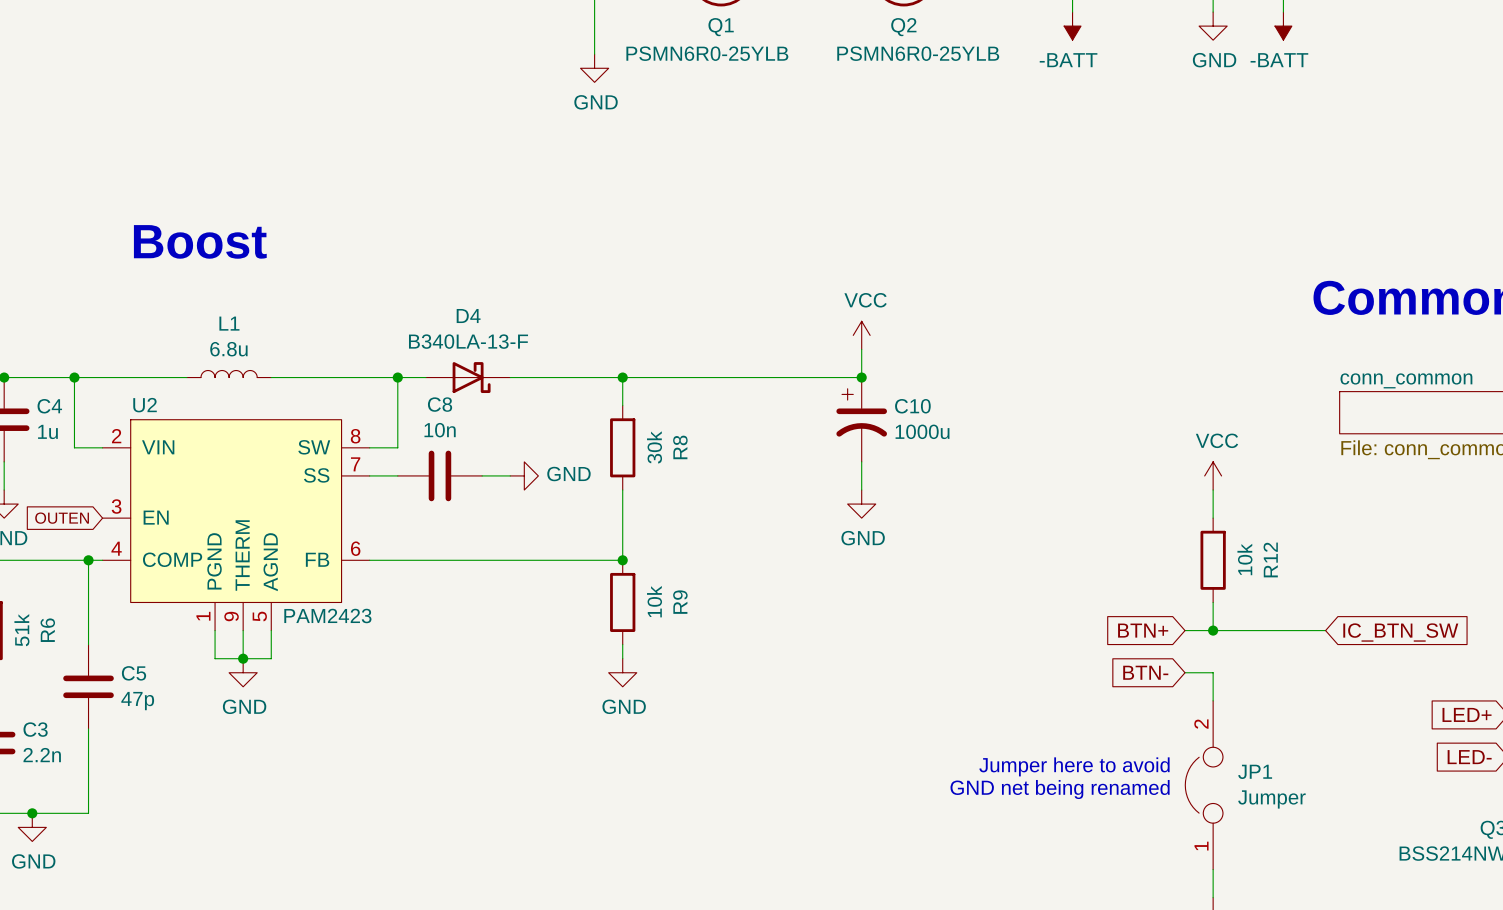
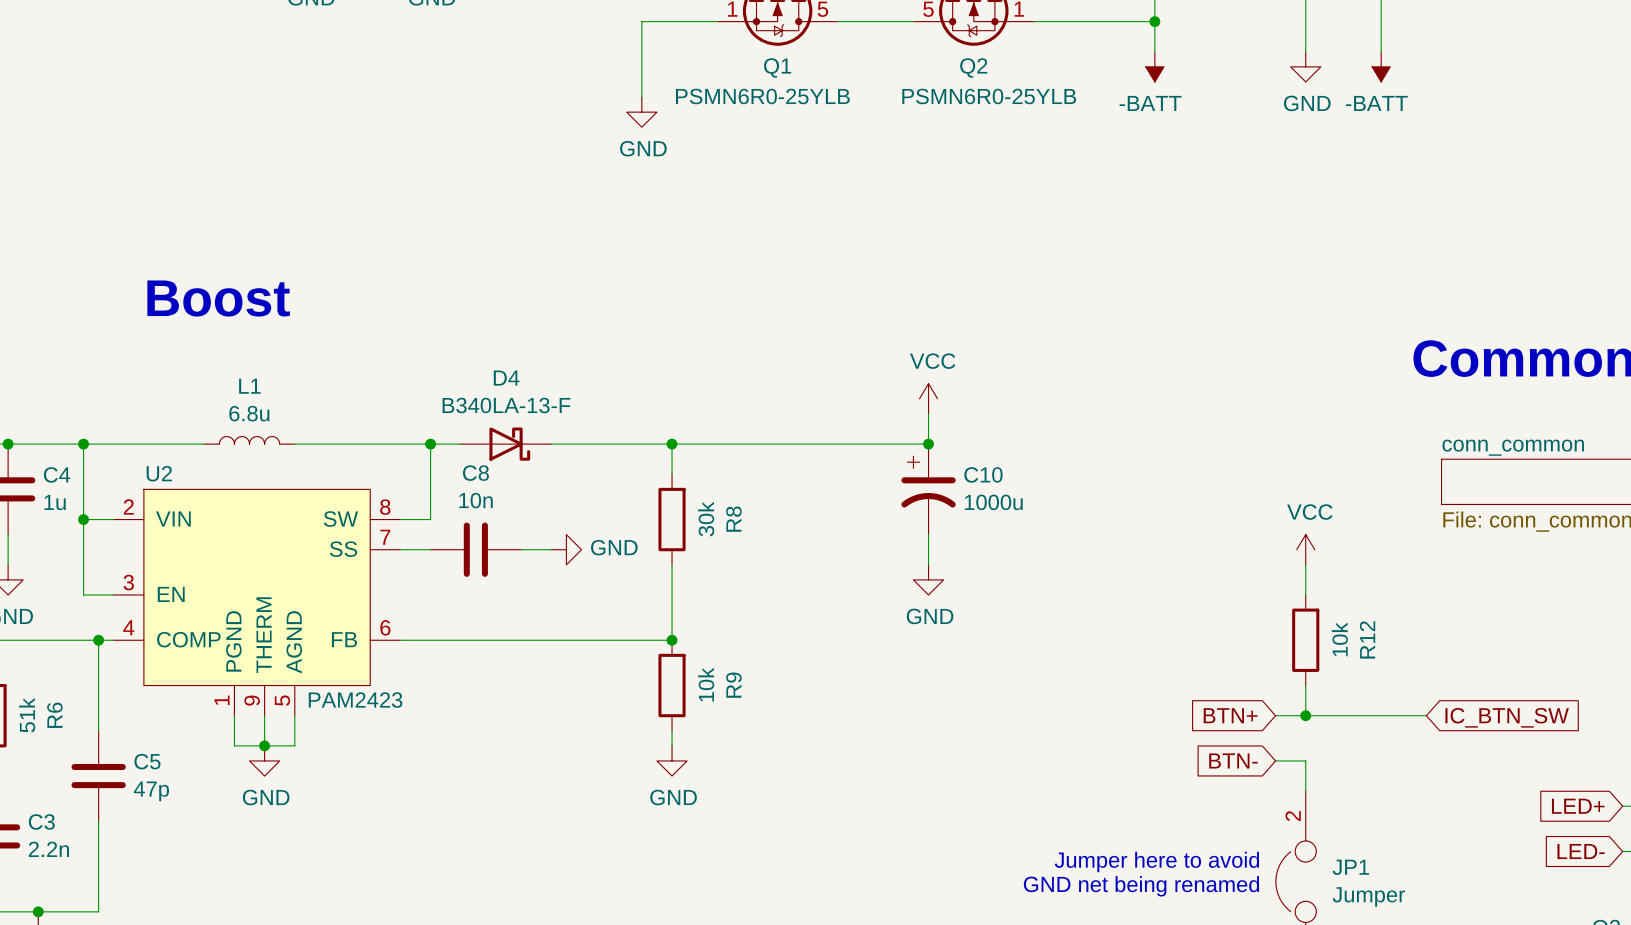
wire: none -> (83, 519) (83, 594) (113, 594)
junction: none -> (83, 519)
global label: OUTEN (62, 518) -> none

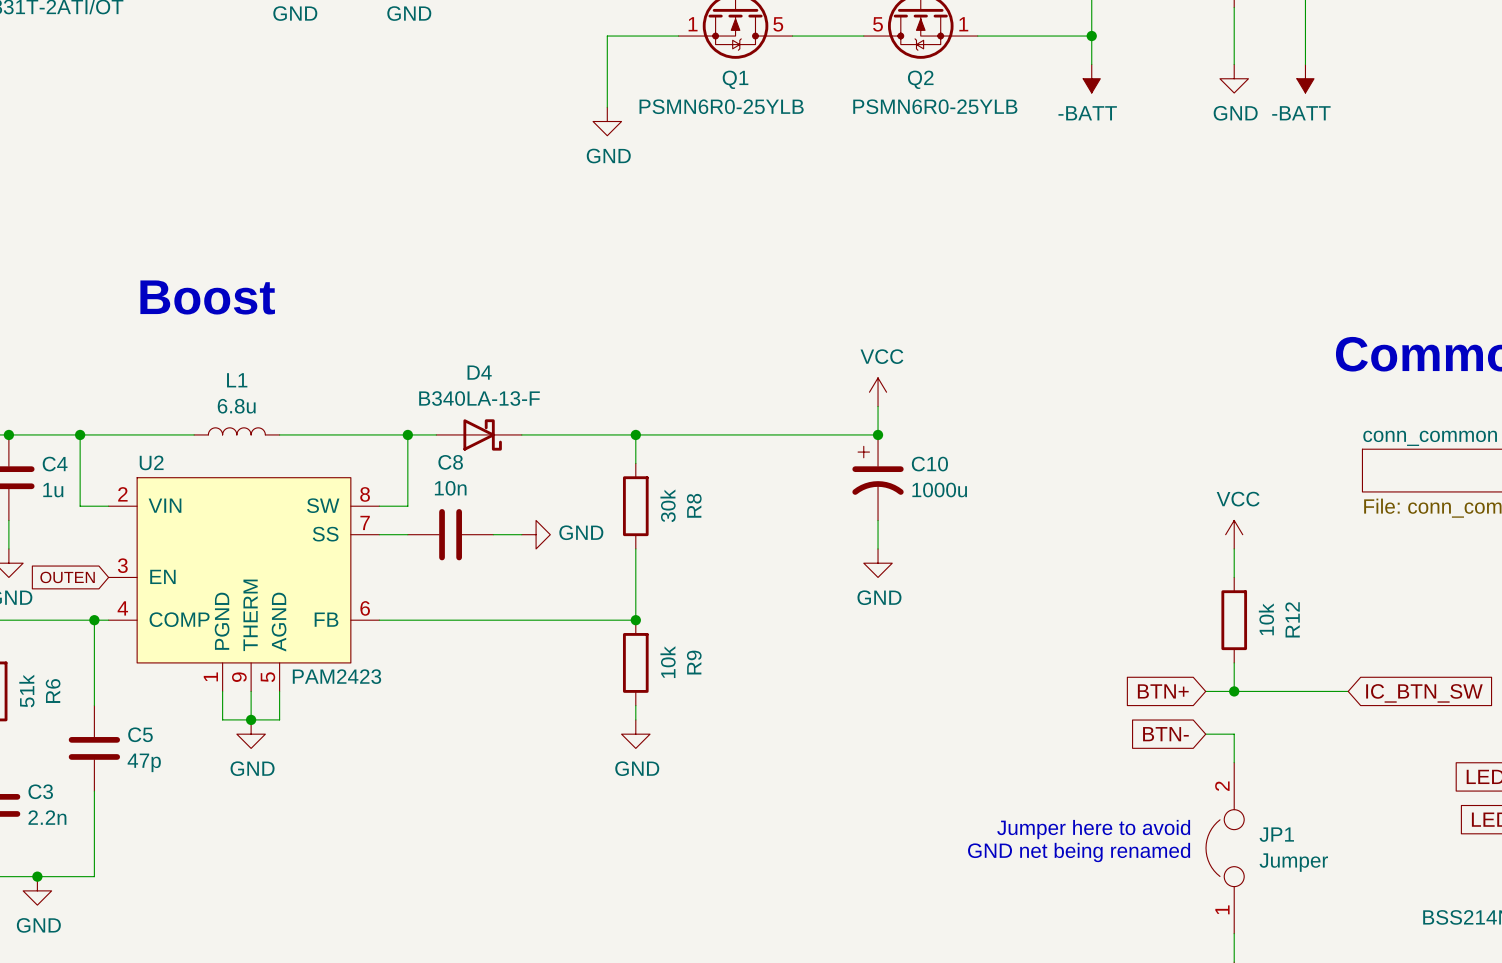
wire: (83, 519) (83, 594) (113, 594) -> none
junction: (83, 519) -> none
global label: none -> OUTEN (67, 577)

